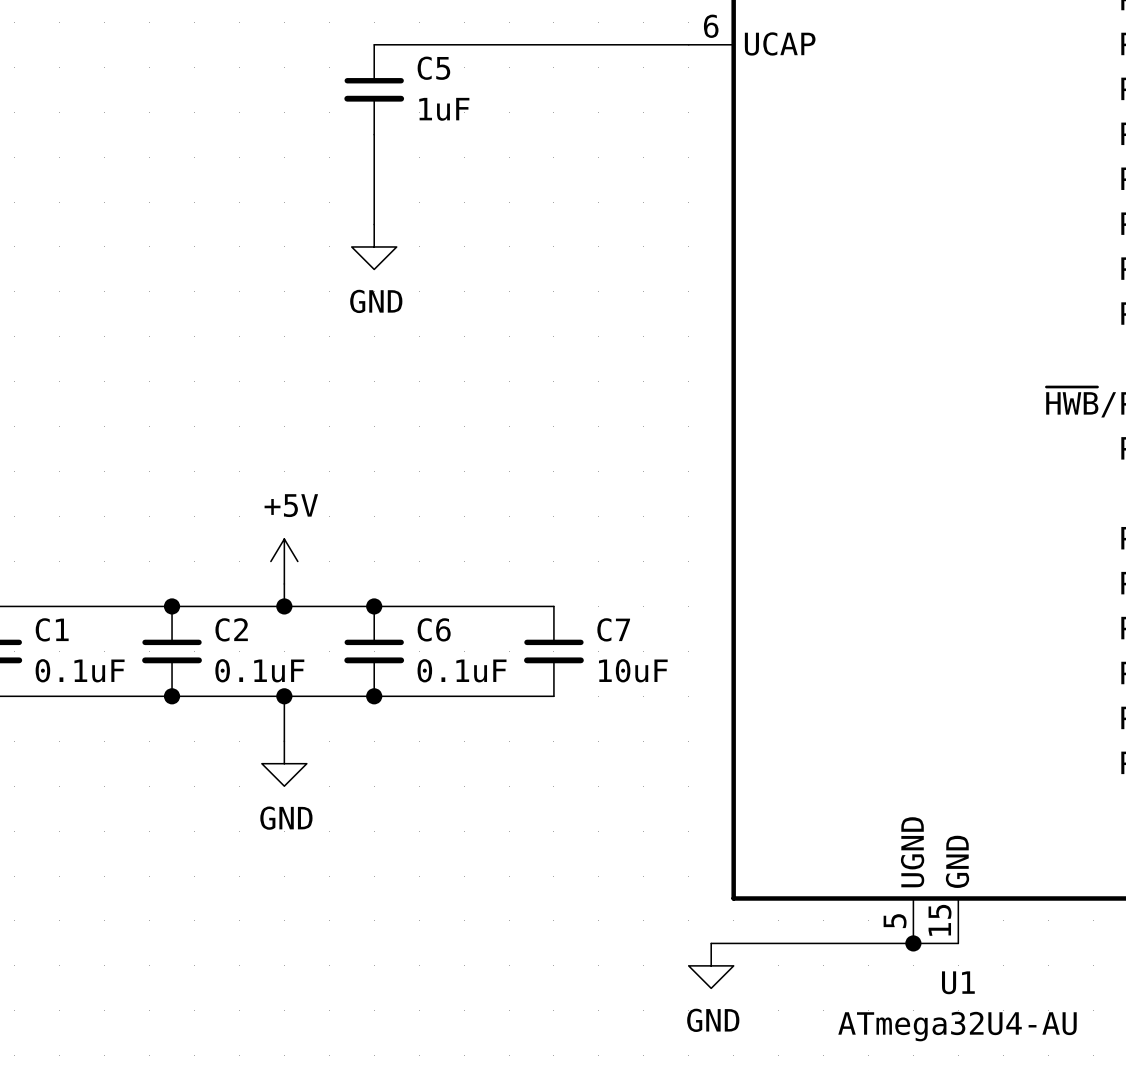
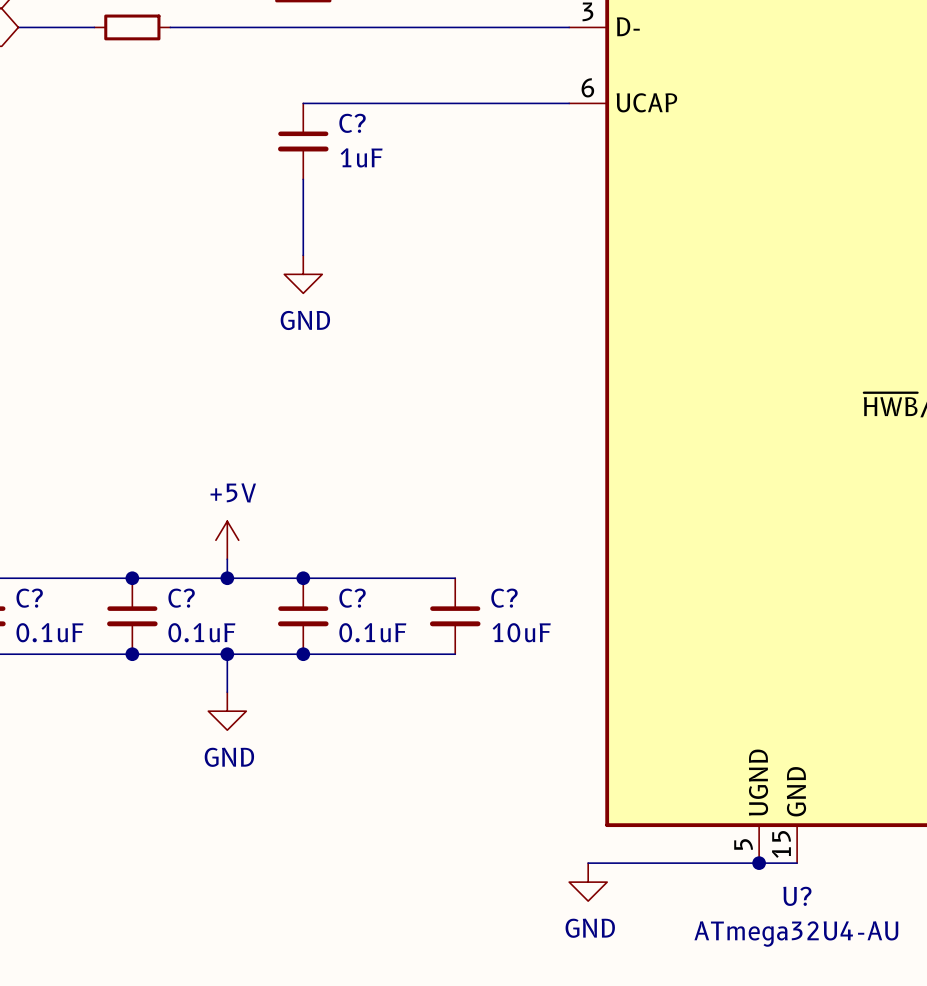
C5 name: C5 (433, 68) -> C? (352, 123)
C1 name: C1 (52, 629) -> C? (29, 598)
C2 name: C2 (231, 629) -> C? (181, 598)
C6 name: C6 (434, 629) -> C? (352, 598)
C7 name: C7 (613, 629) -> C? (504, 598)
U1 name: U1 (958, 982) -> U? (797, 896)

